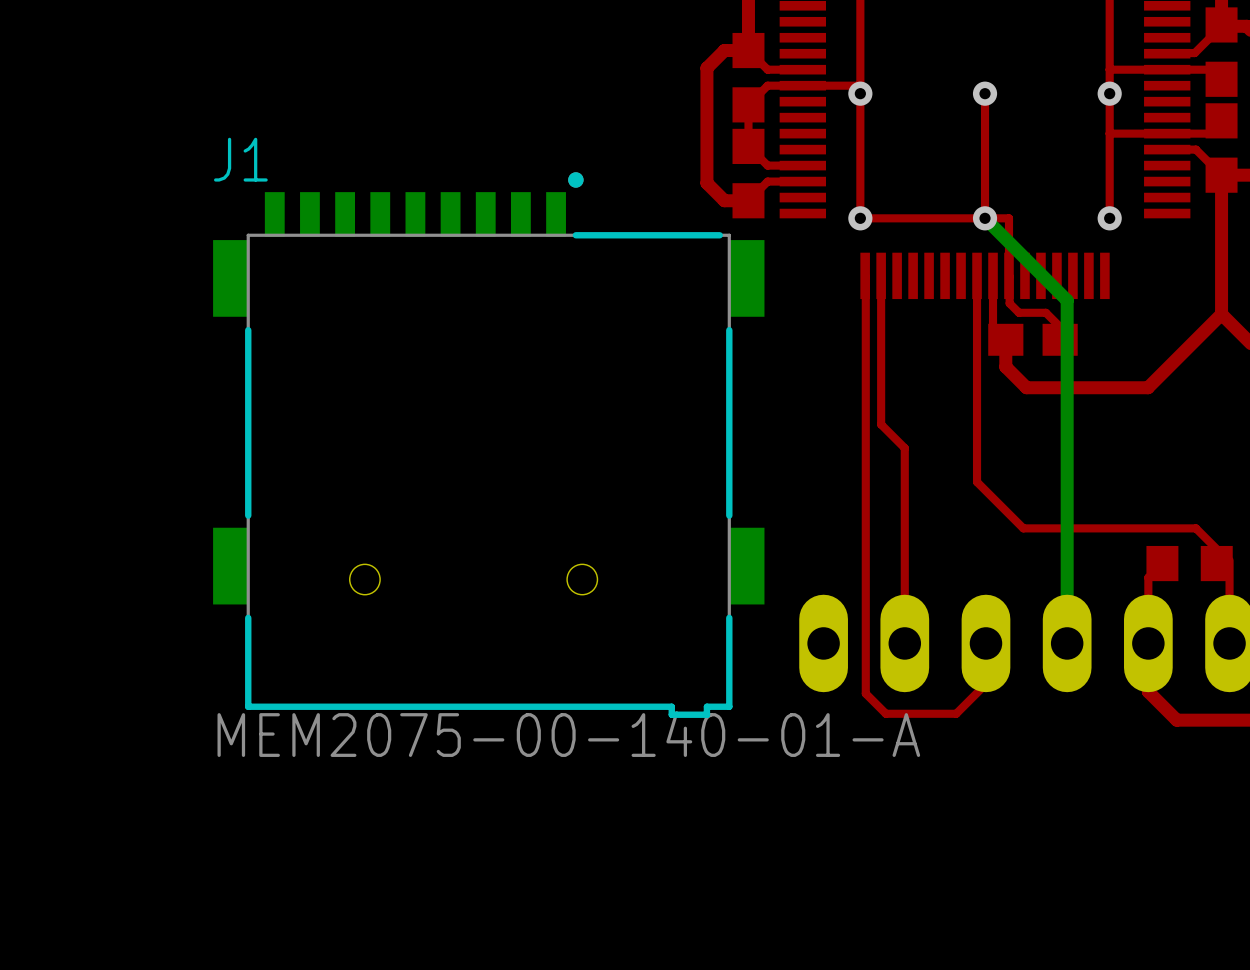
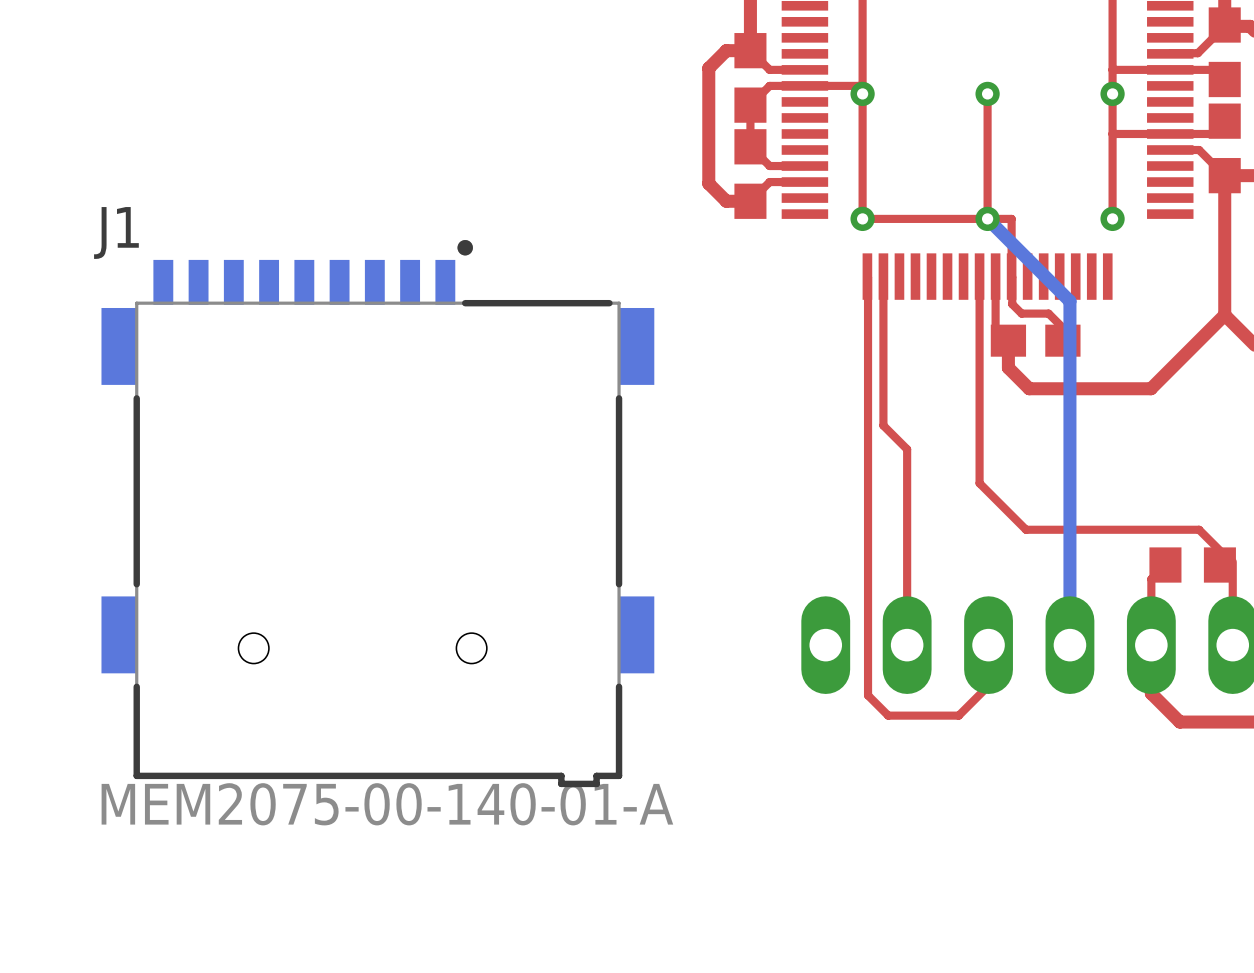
J1 position: (488, 445) -> (377, 513)

